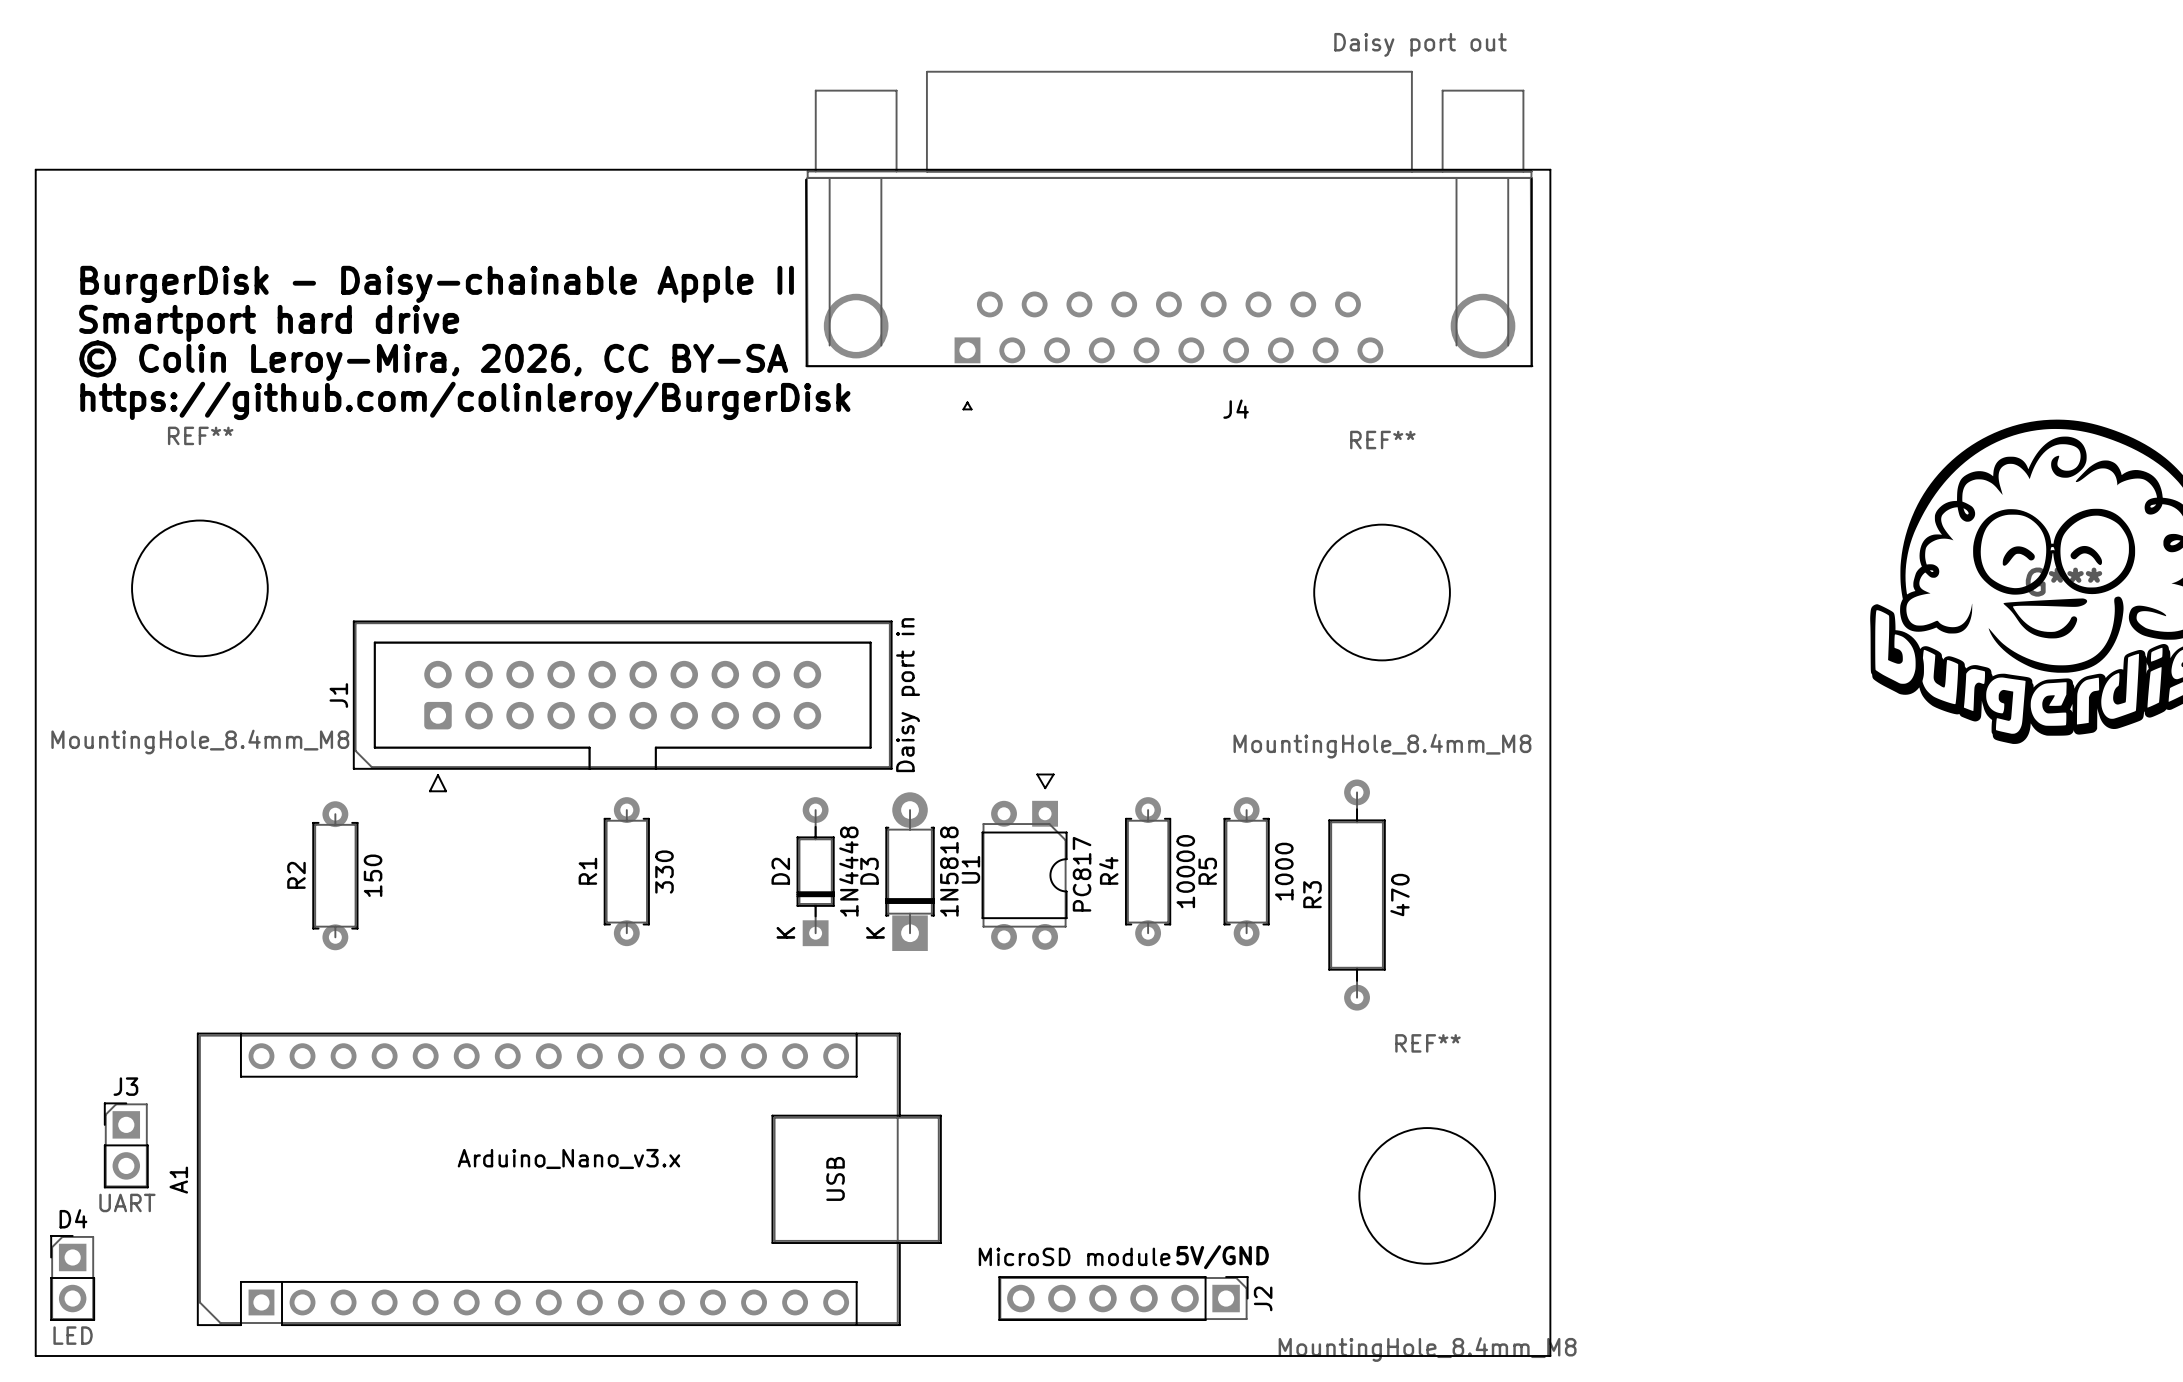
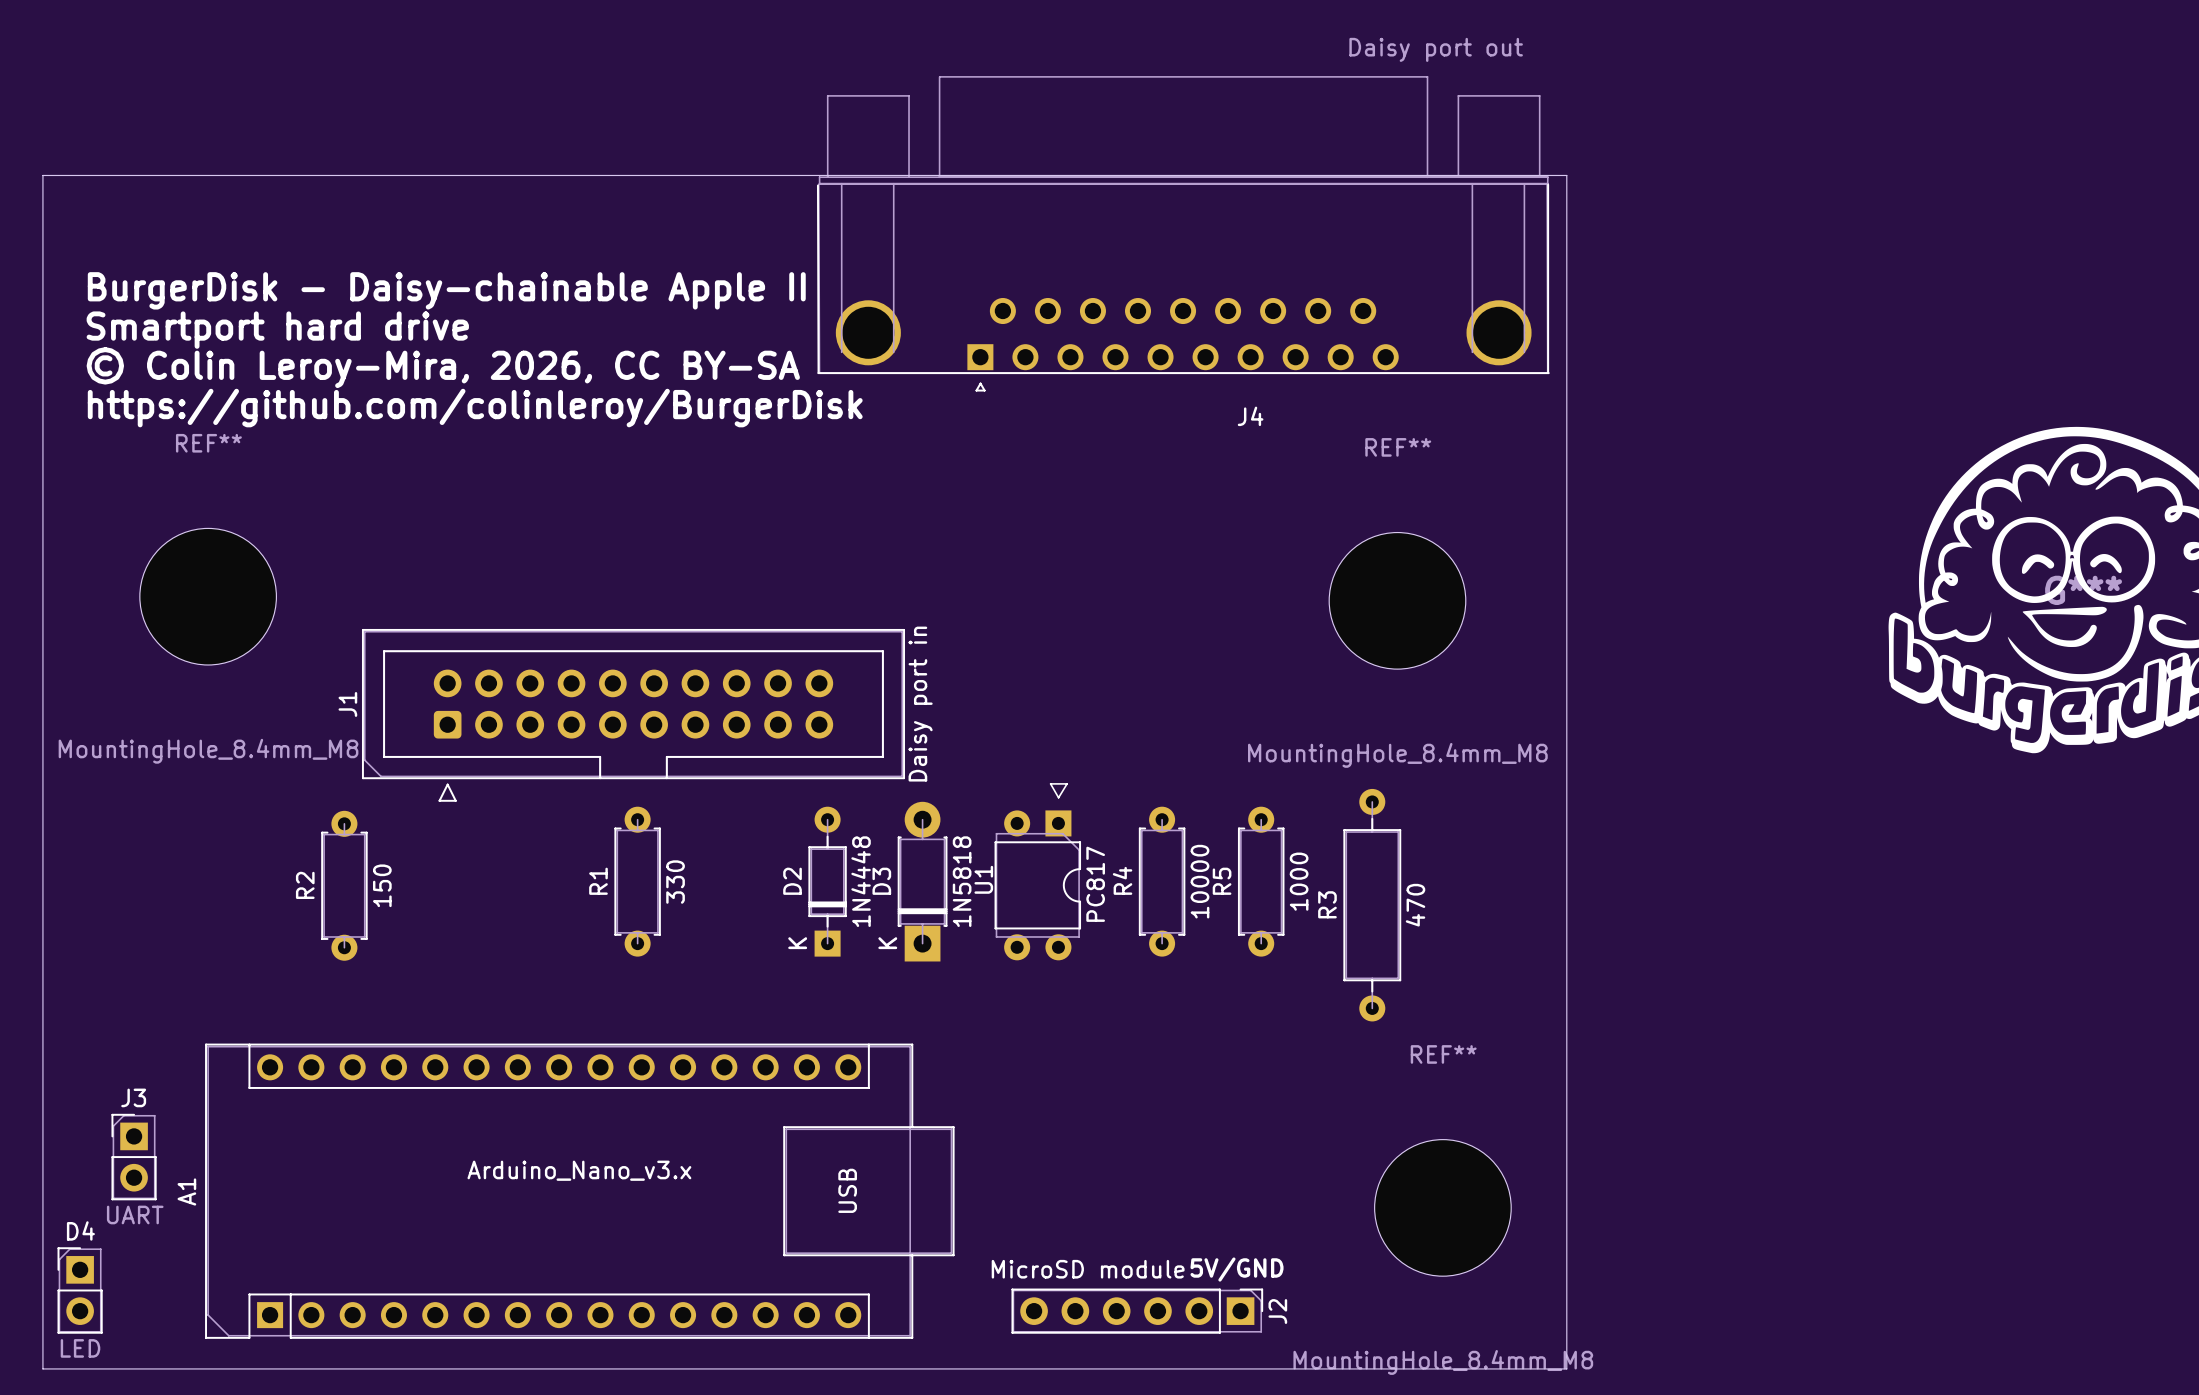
J4 footprint: [805, 70, 1534, 411] -> [816, 76, 1550, 392]

